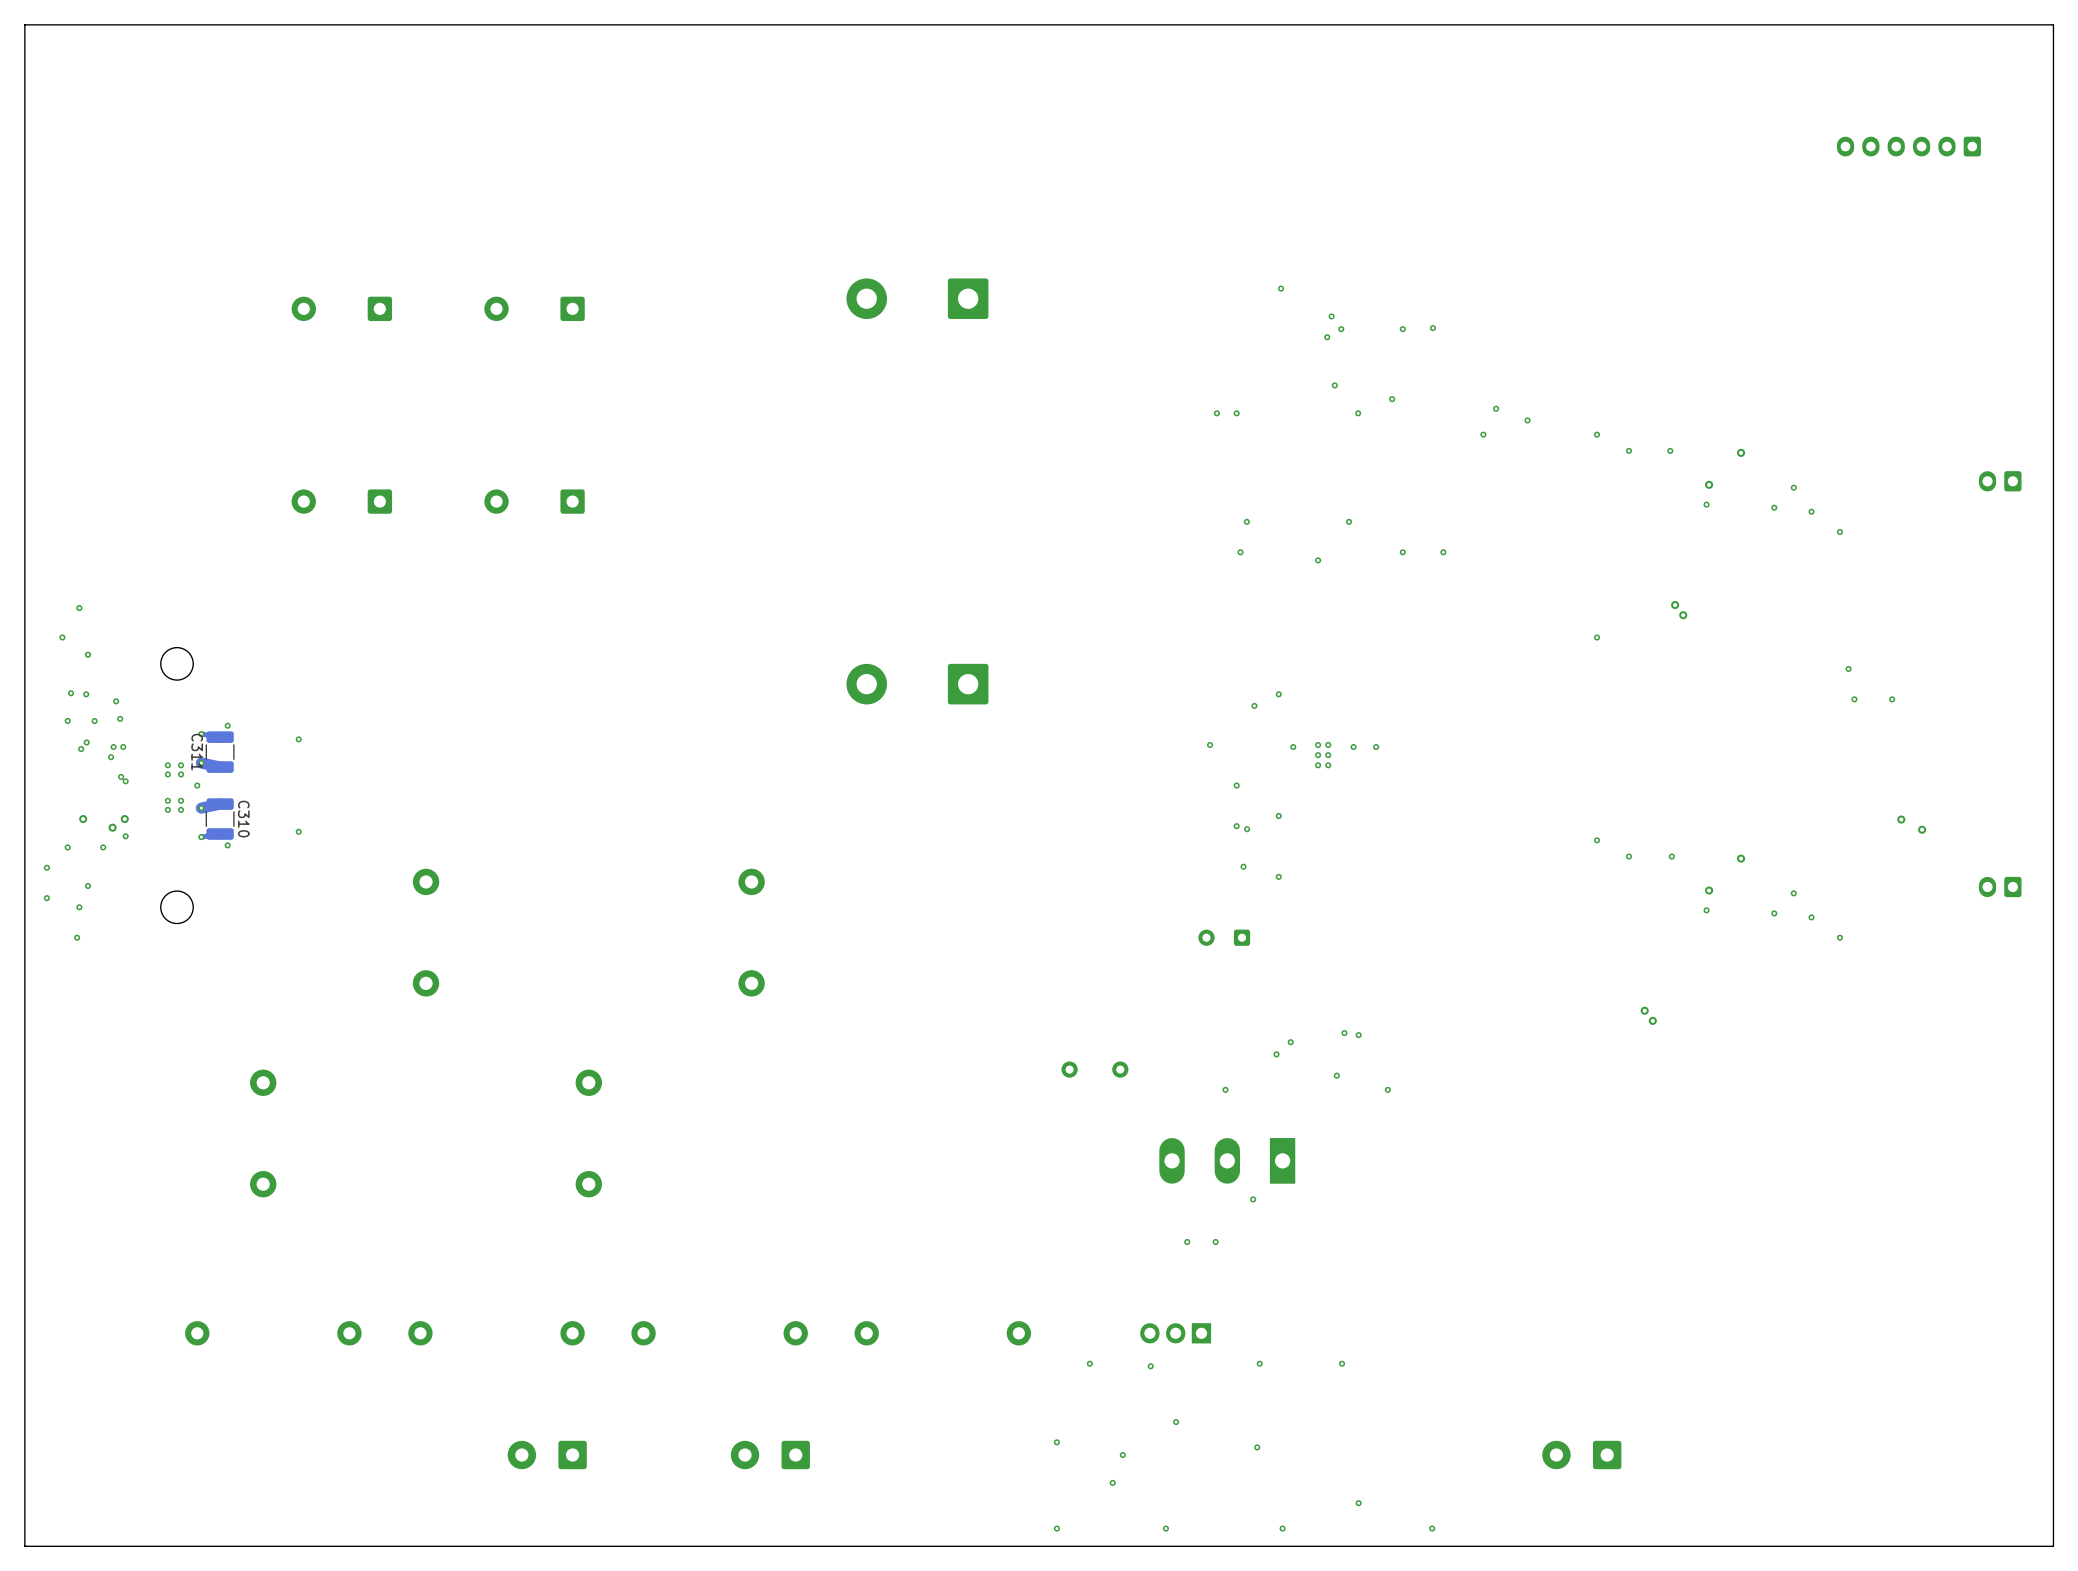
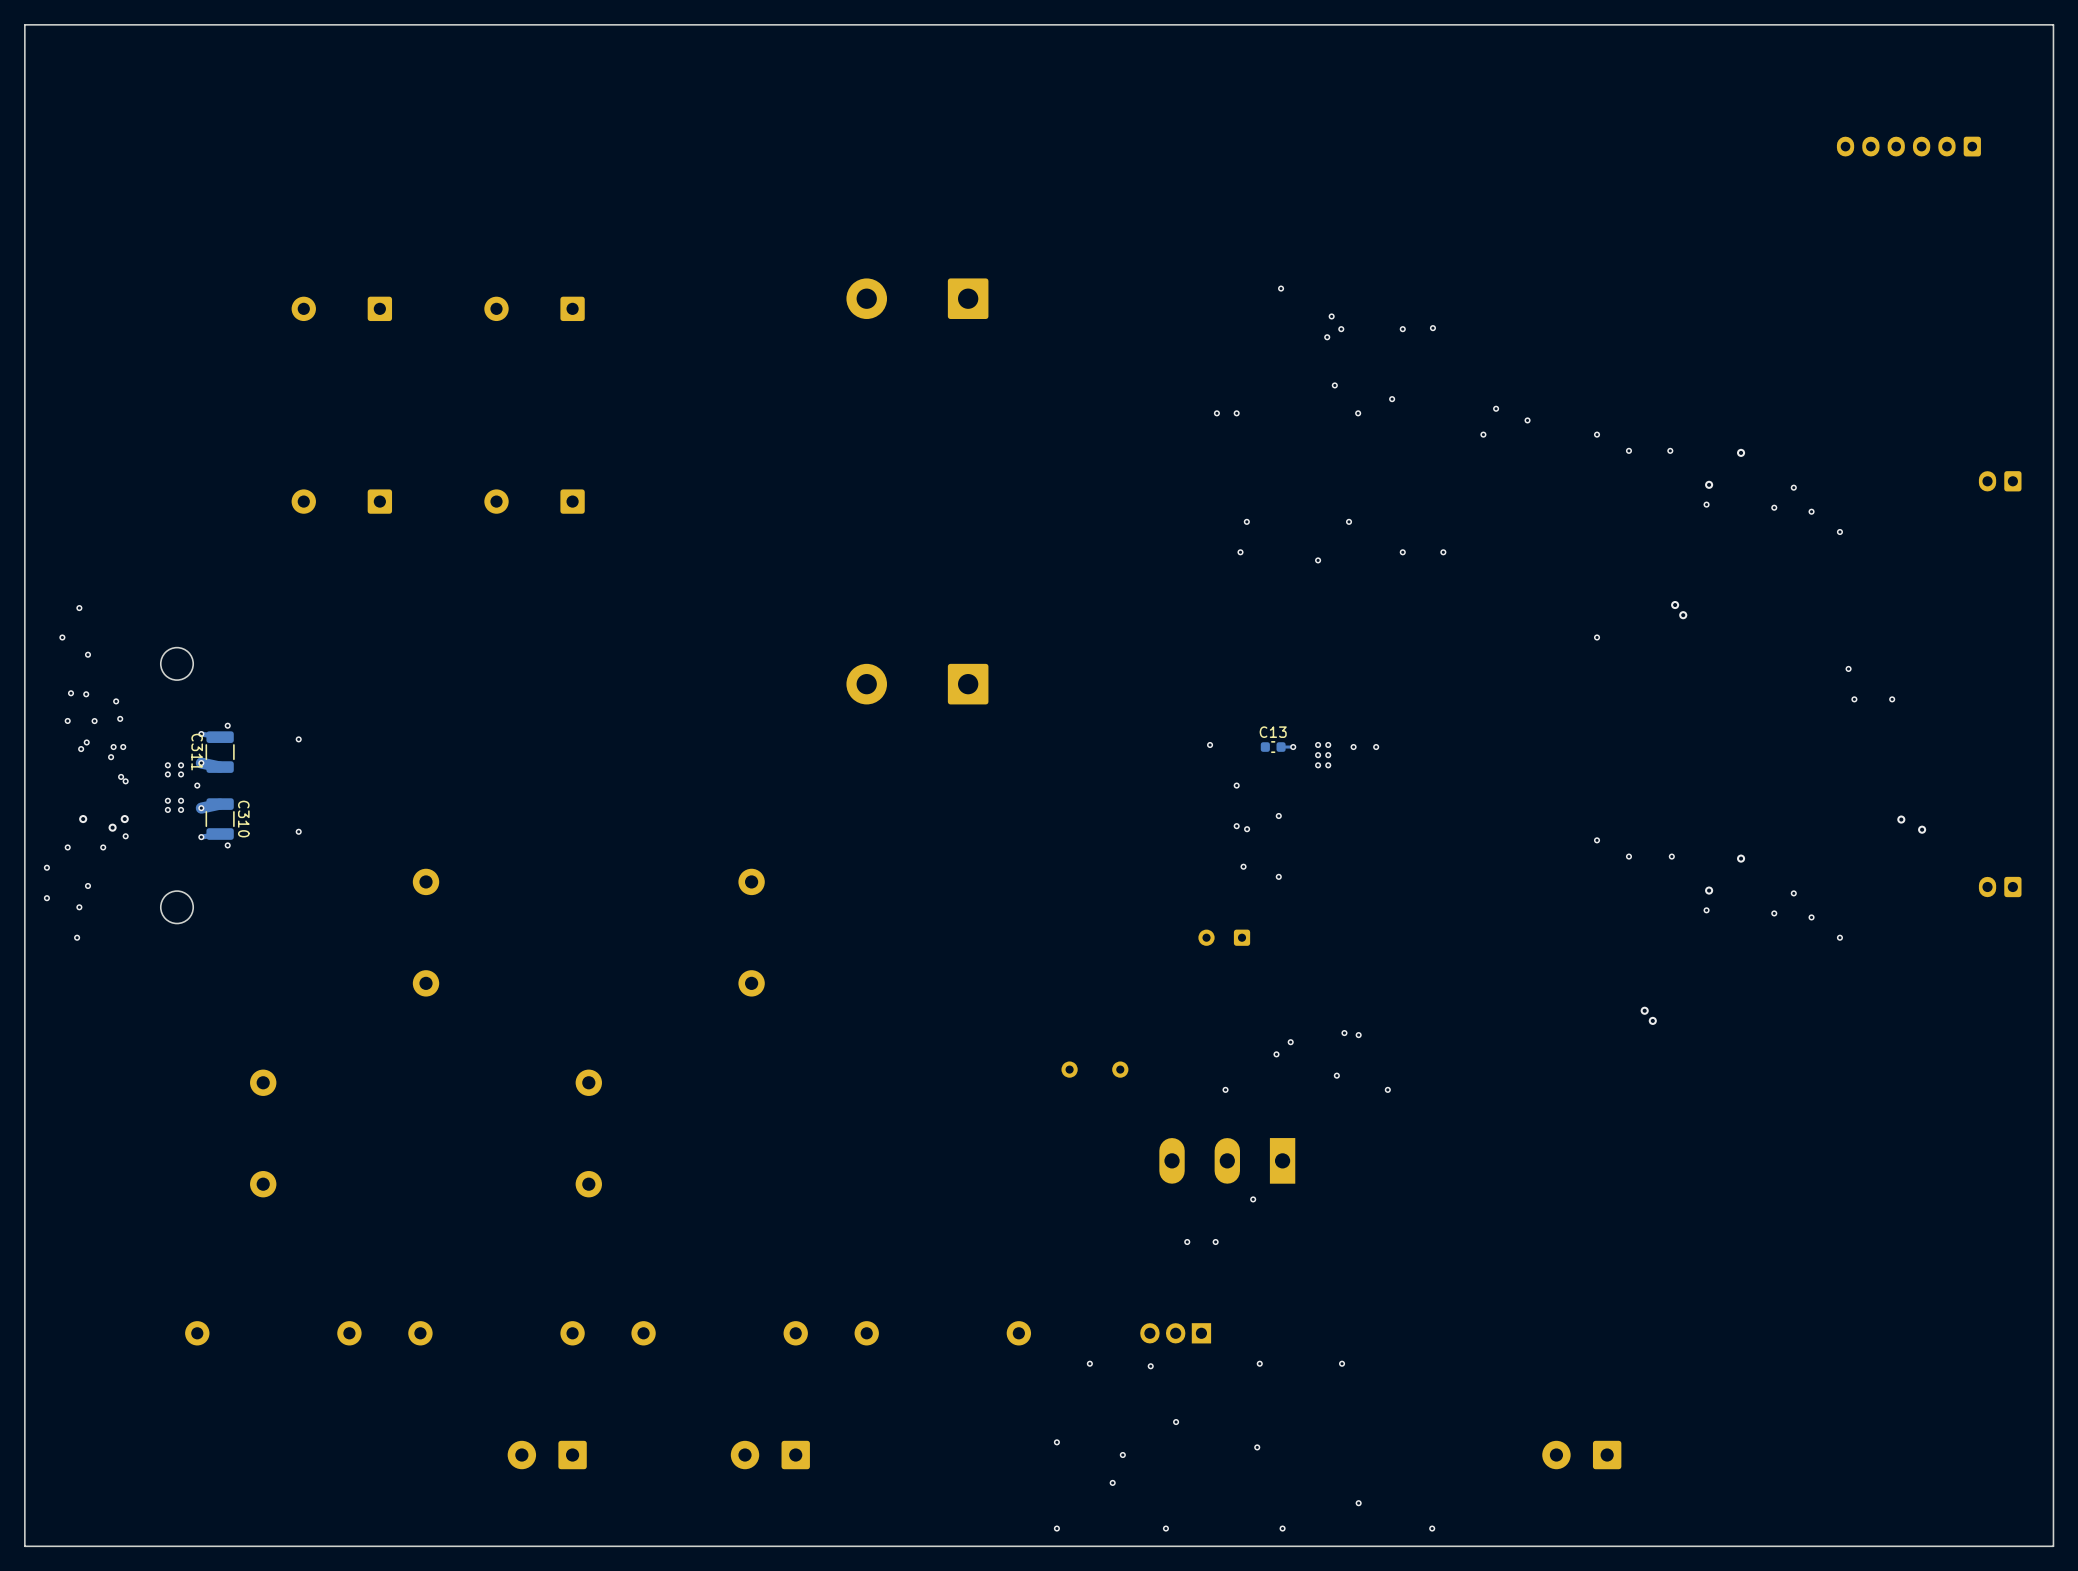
via: (1278, 694) -> none
via: (1254, 705) -> none
C13: none -> (1273, 747)
track: none -> (1293, 747) (1281, 747)

